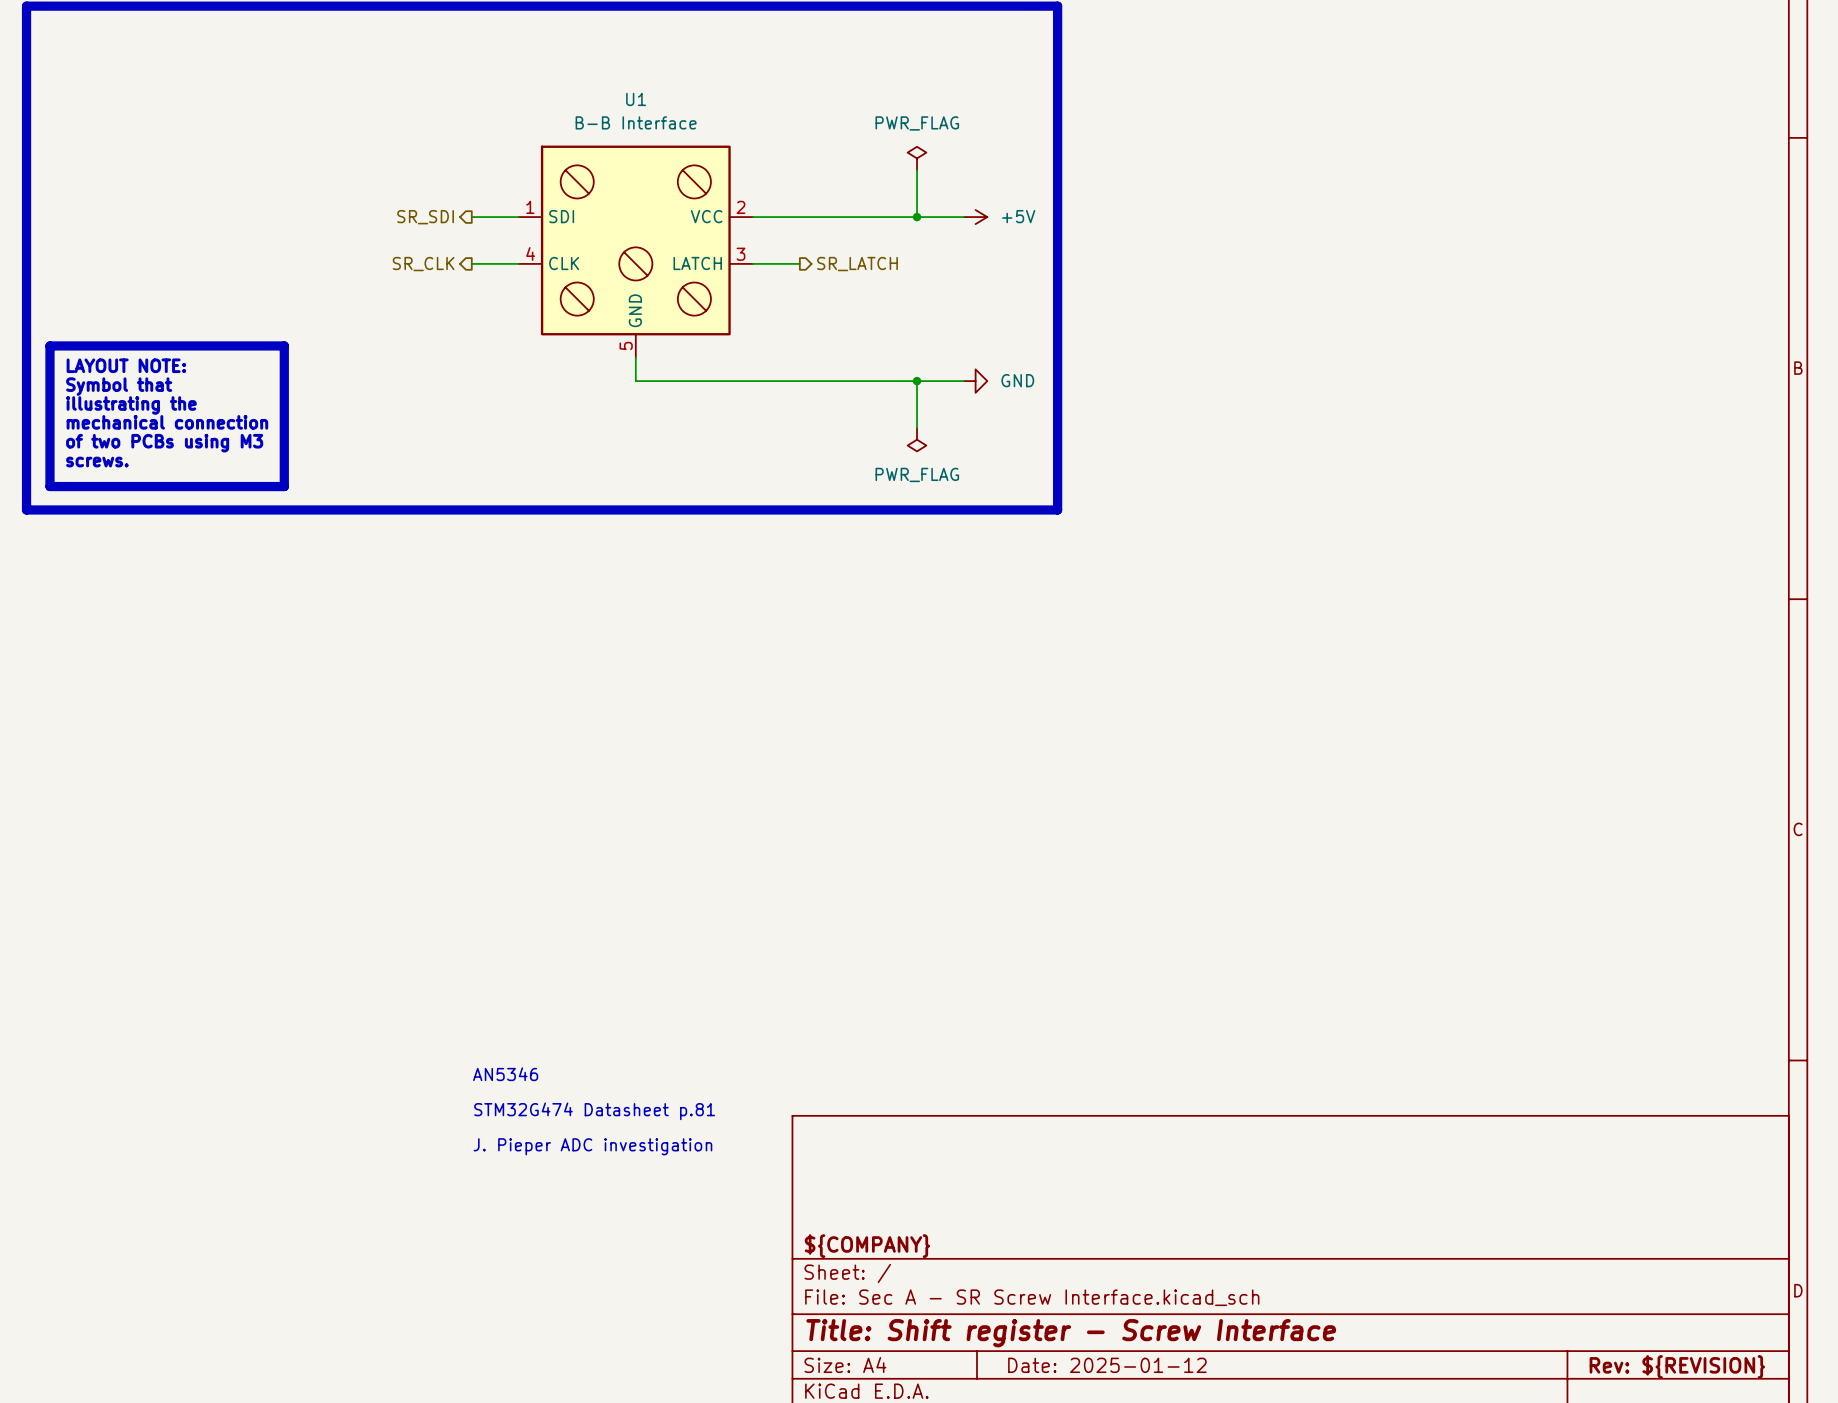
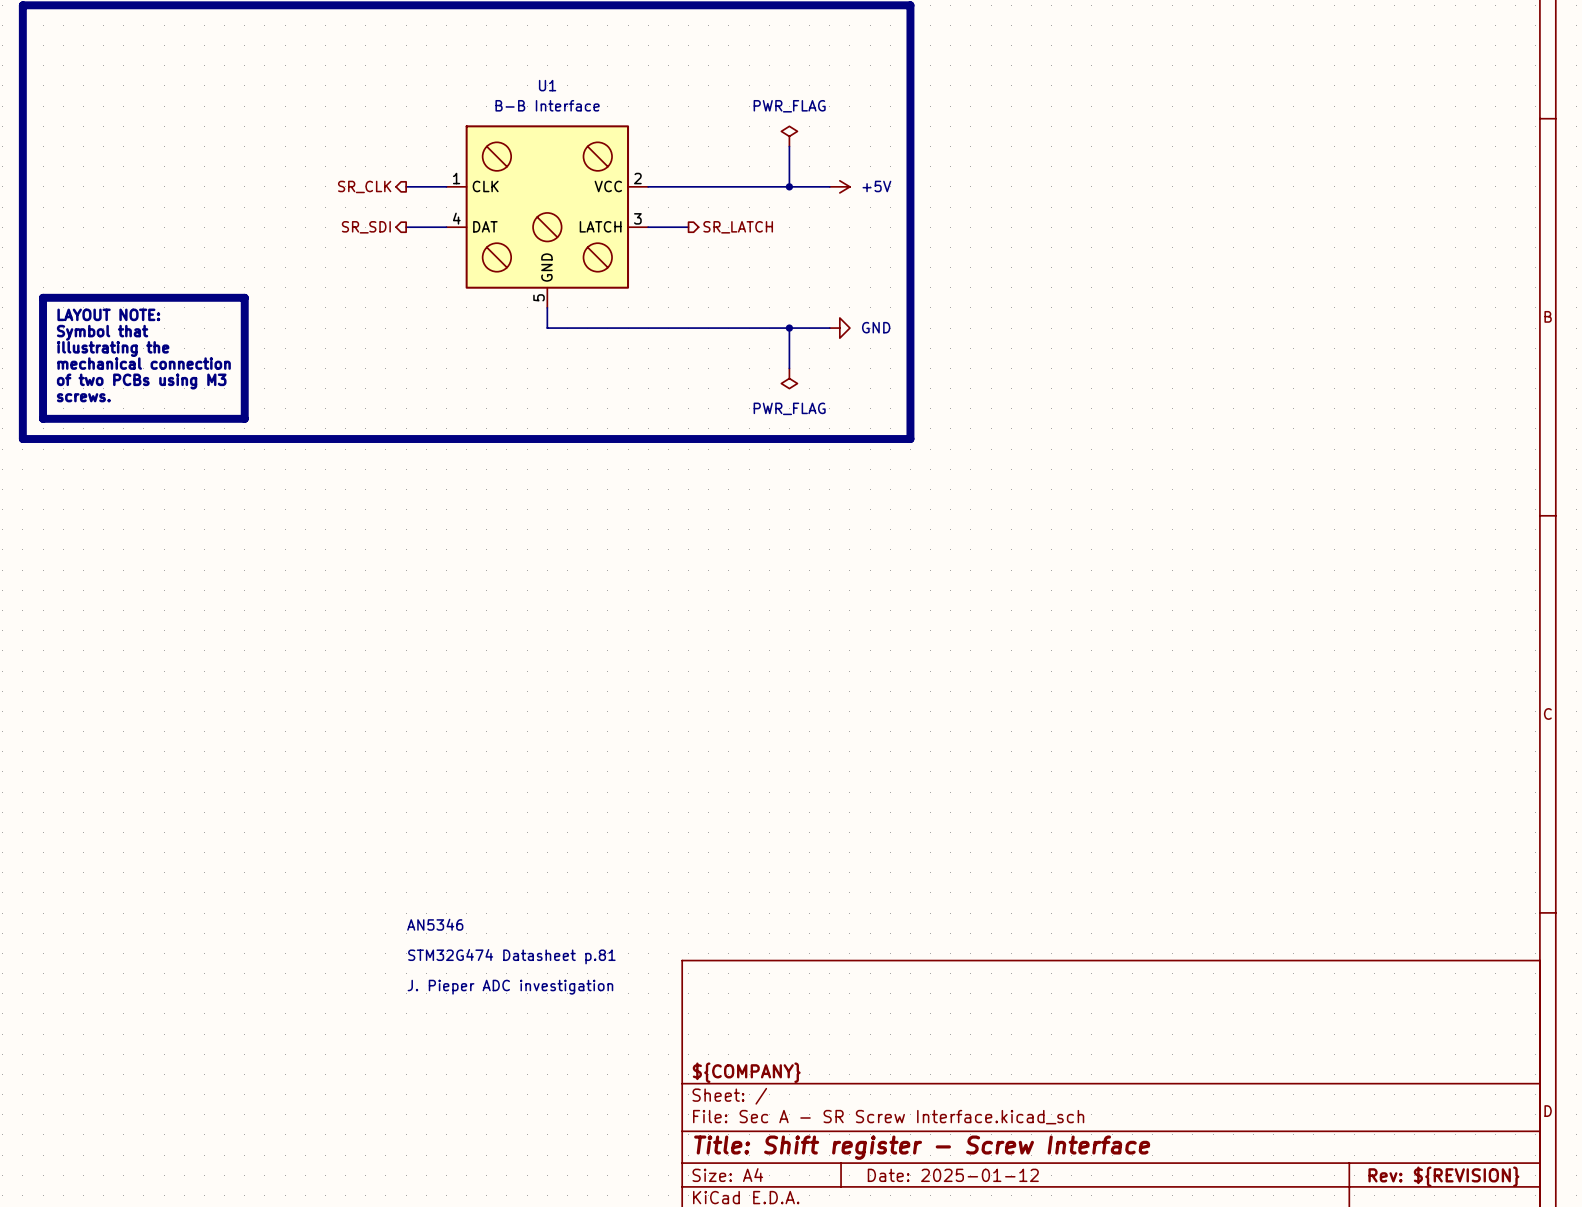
U1 pin name: SDI (561, 216) -> CLK (485, 186)
hierarchical label: SR_SDI (425, 217) -> SR_CLK (364, 186)
U1 pin name: CLK (564, 263) -> DAT (485, 226)
hierarchical label: SR_CLK (423, 264) -> SR_SDI (366, 227)

